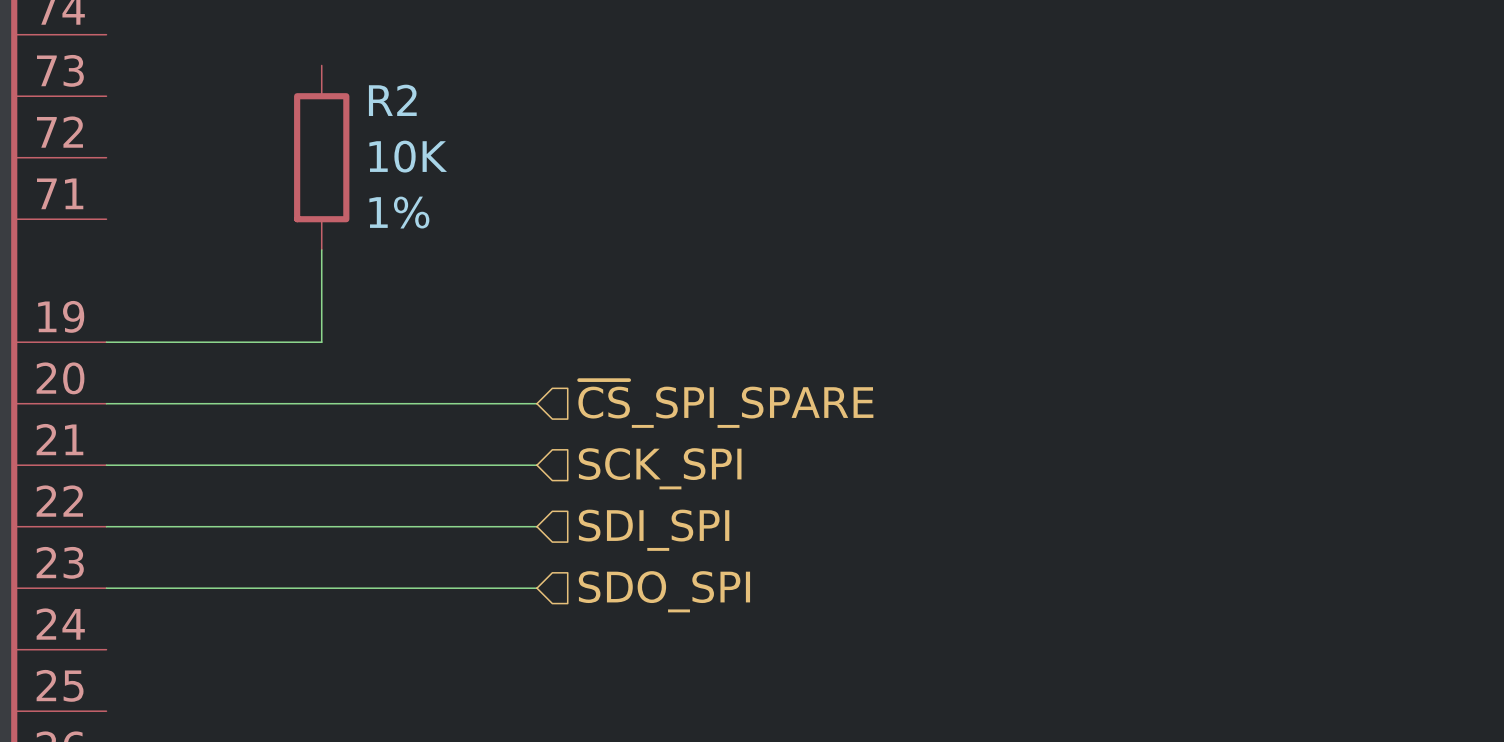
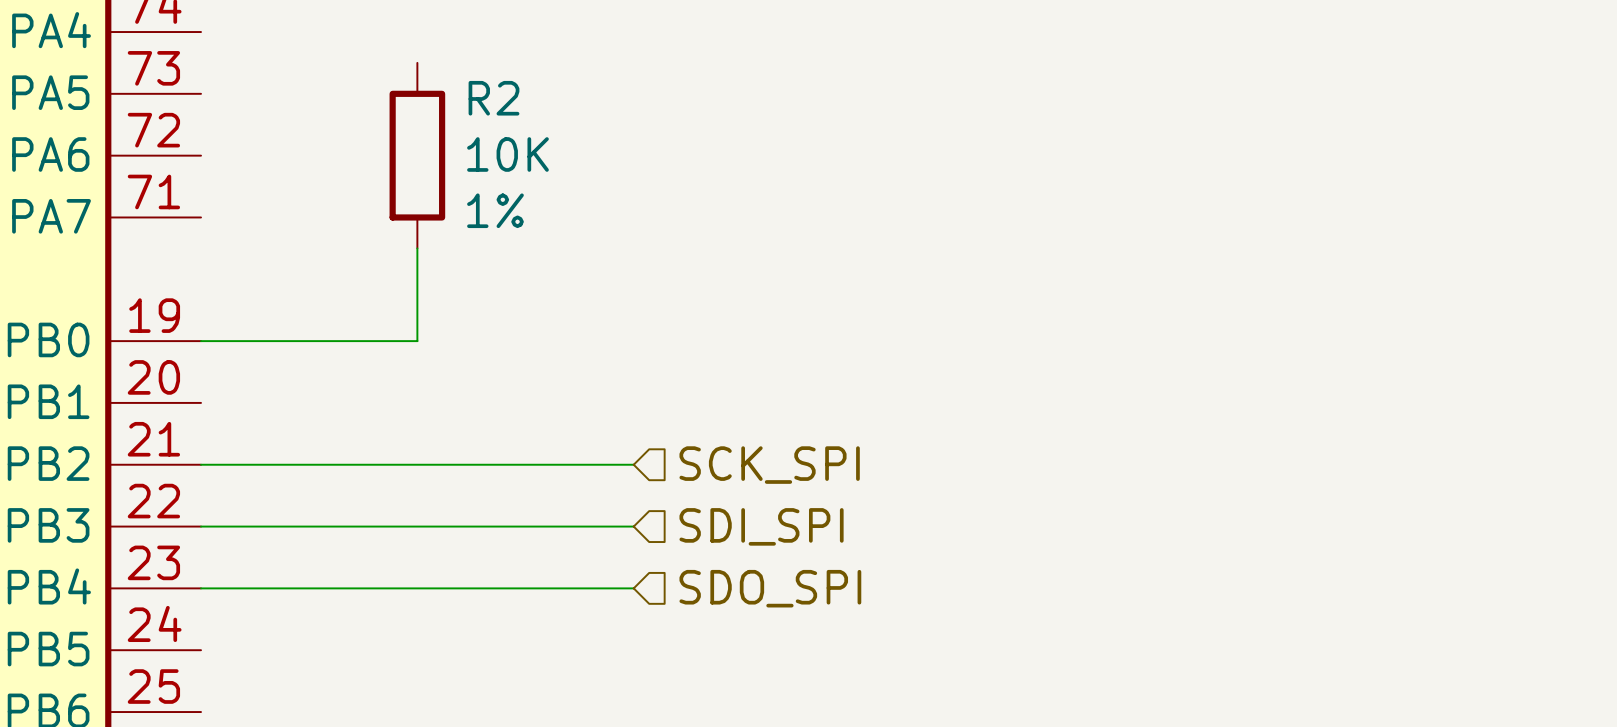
wire: (106, 403) (536, 403) -> none
hierarchical label: ~{CS}_SPI_SPARE (725, 403) -> none

